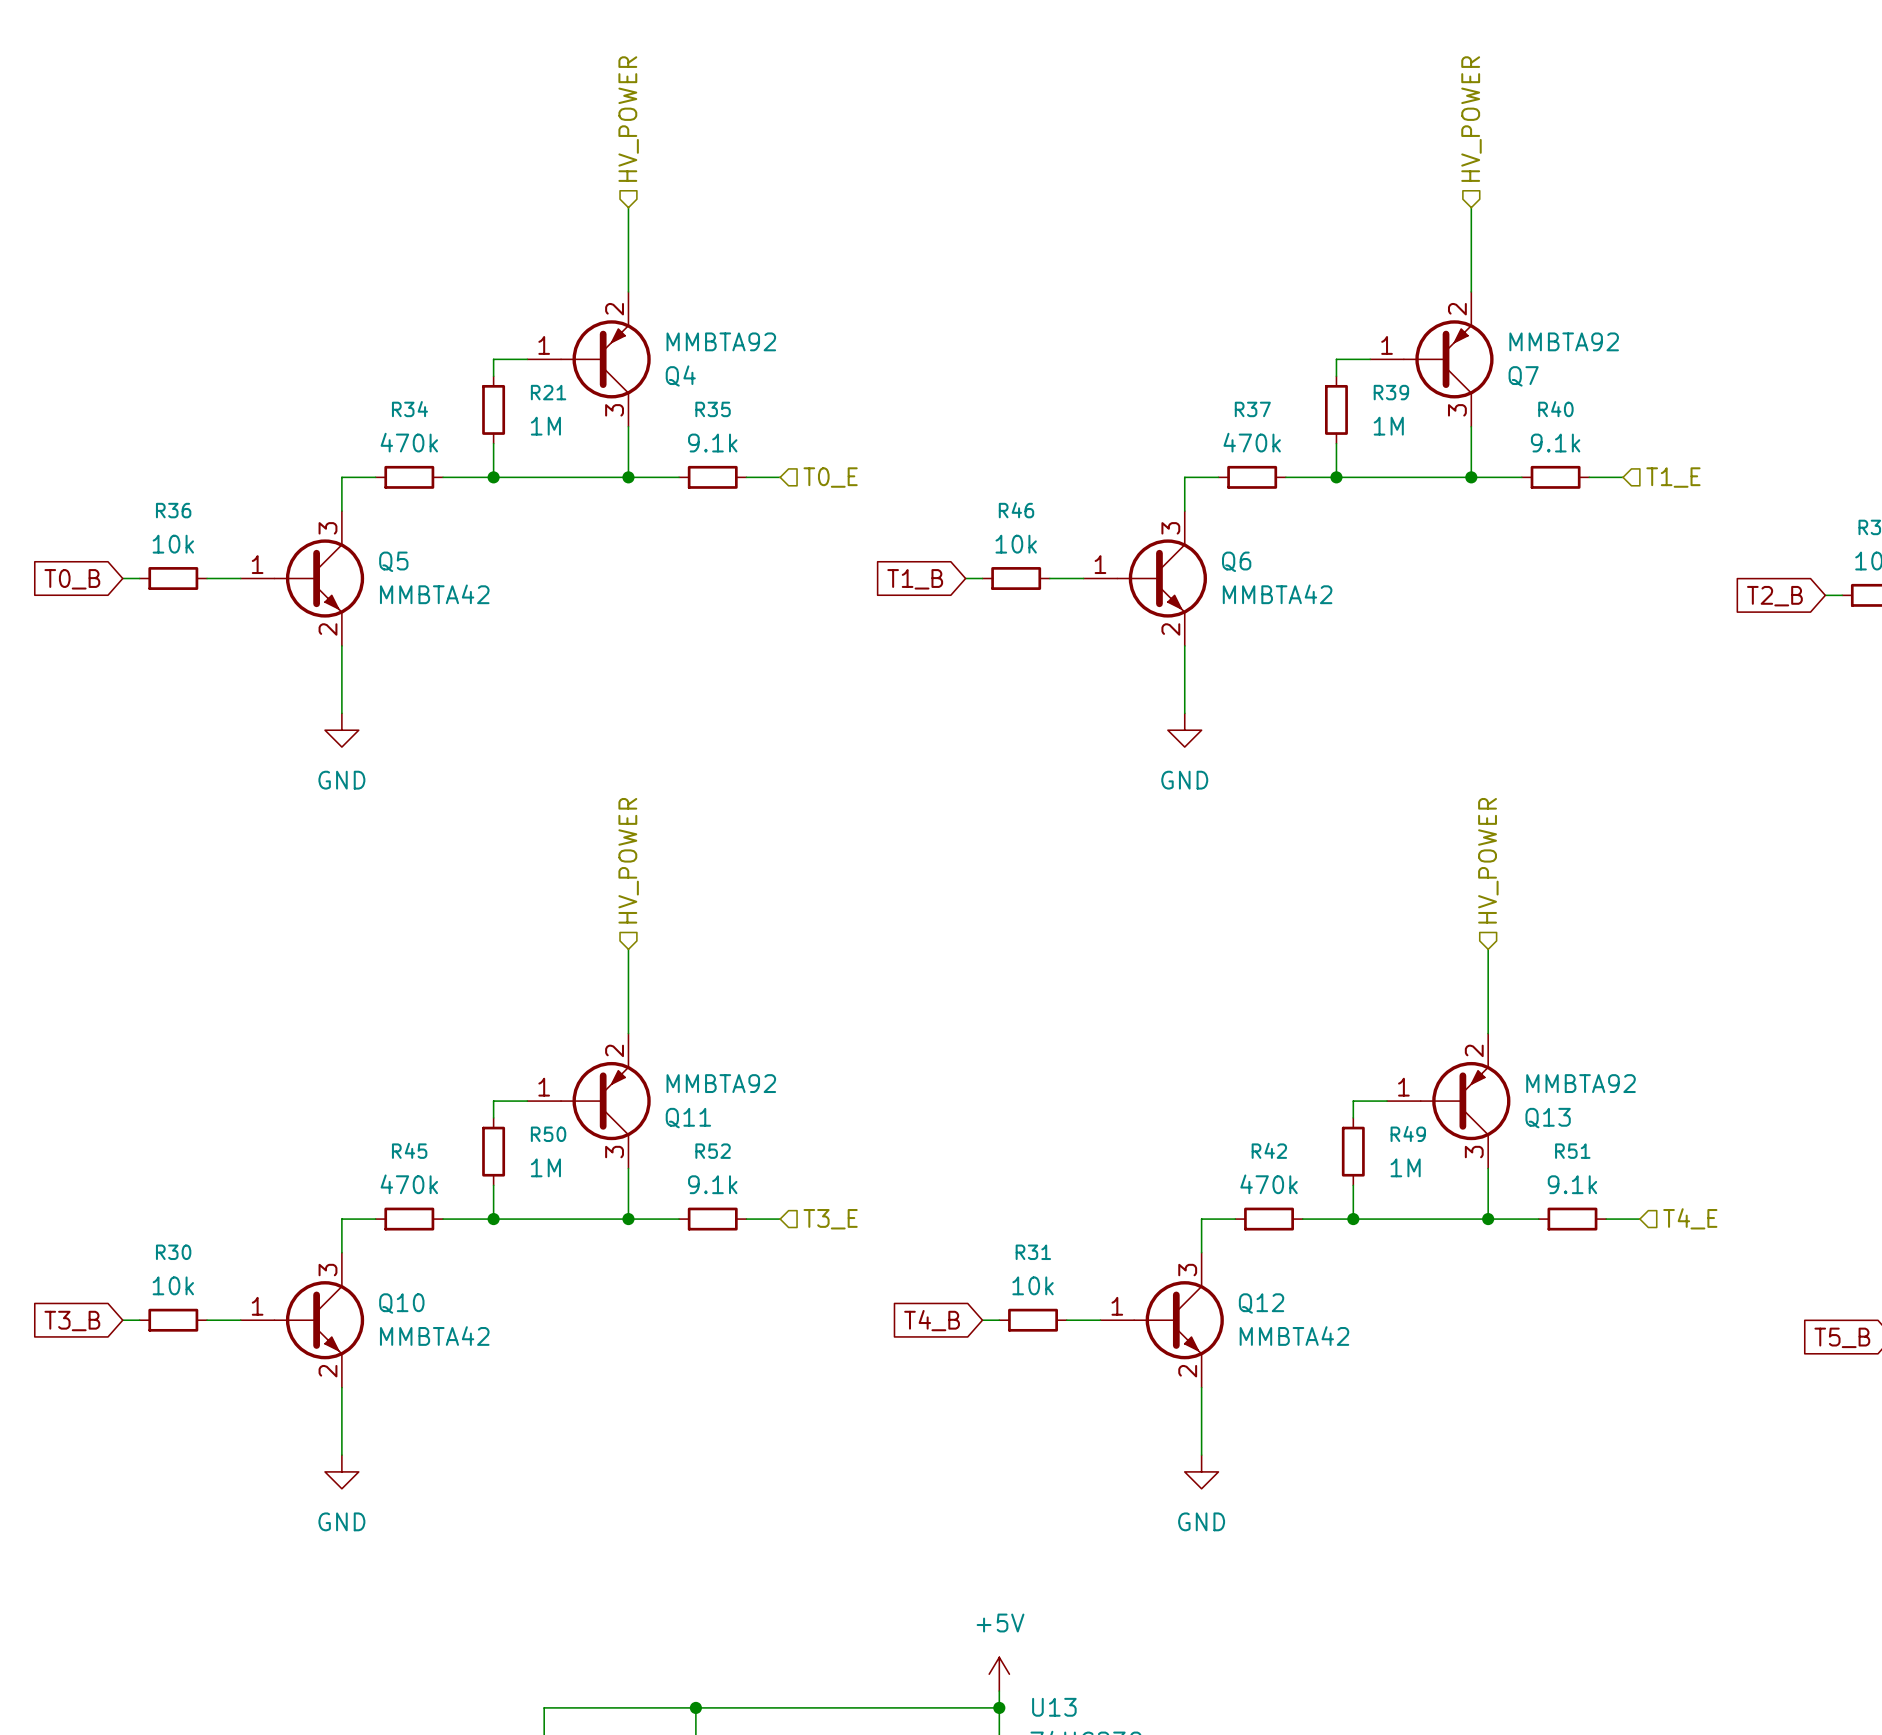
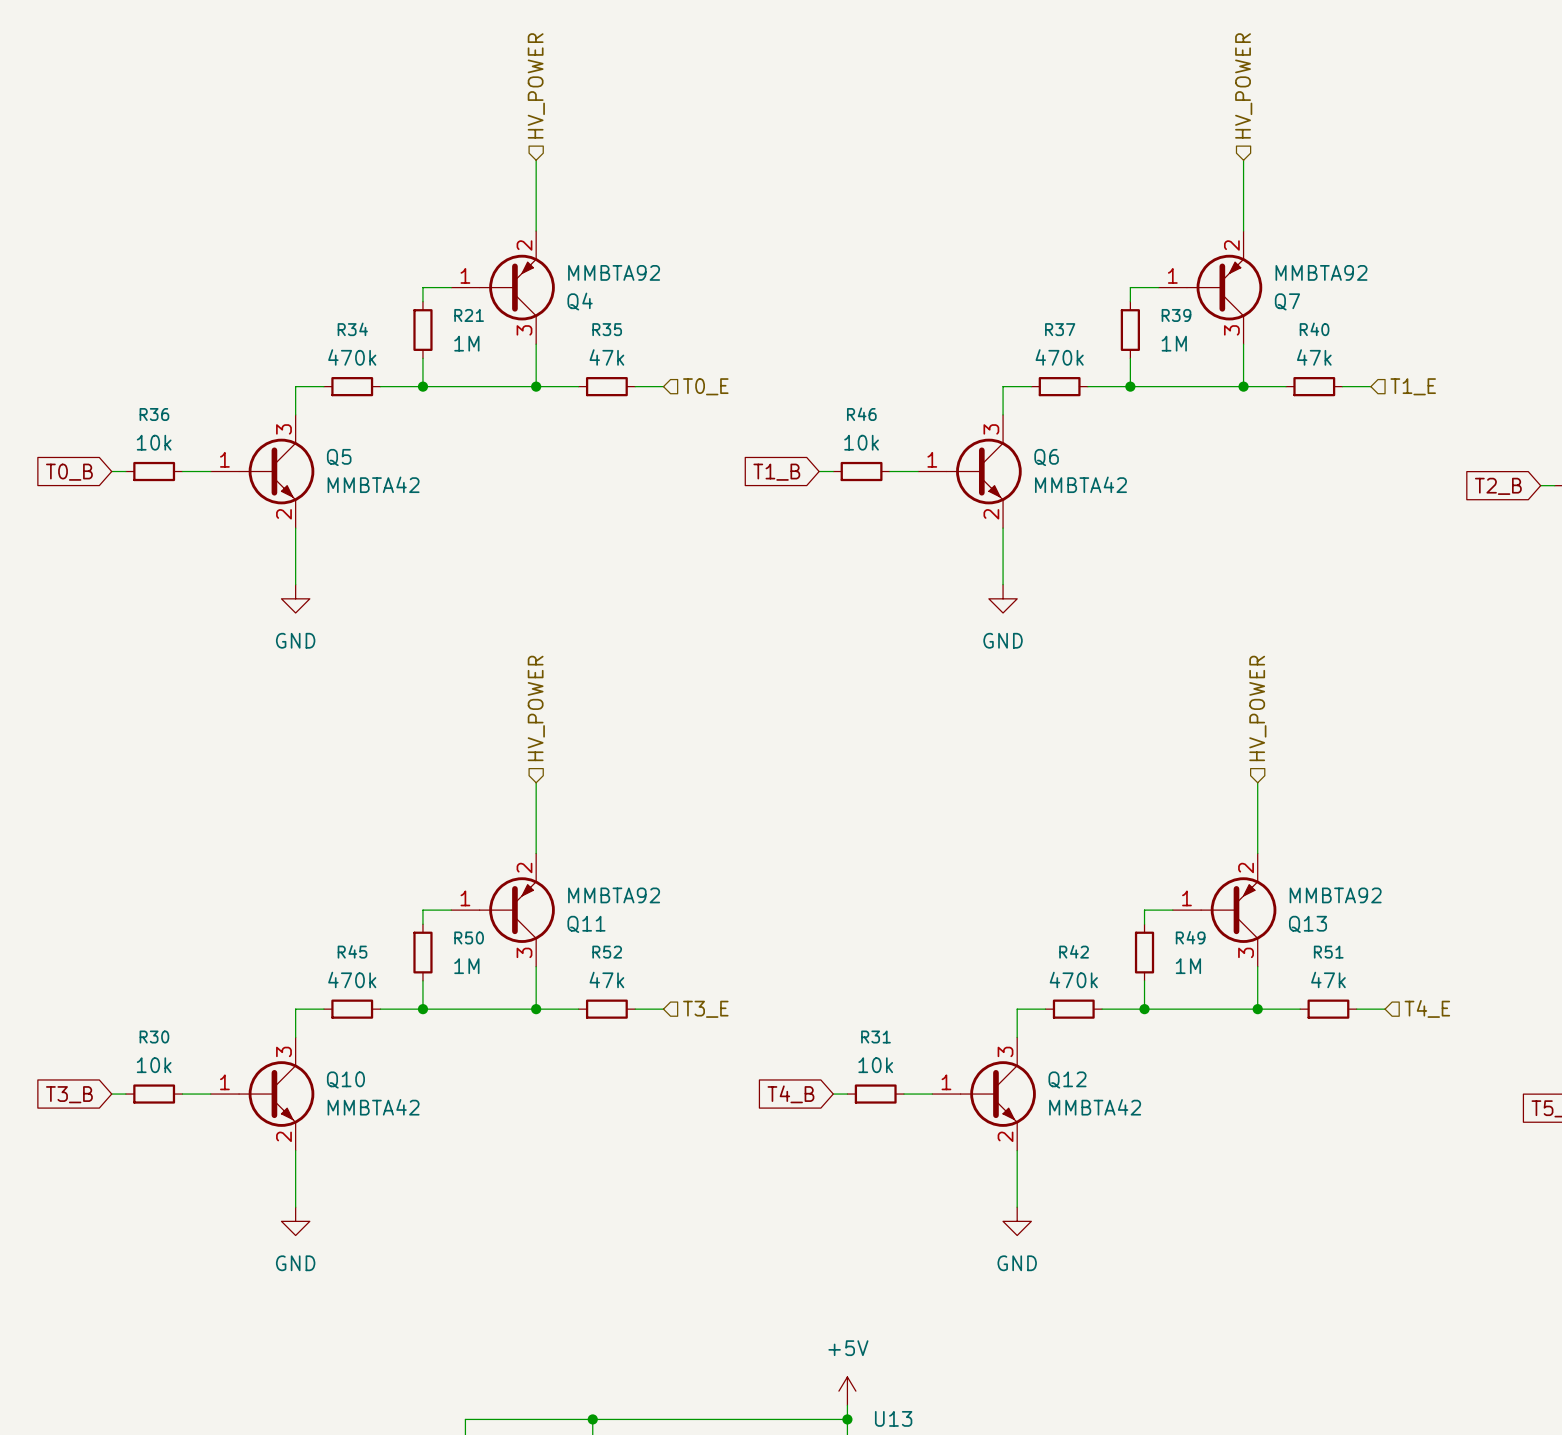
R35 value: 9.1k (712, 443) -> 47k (606, 357)
R40 value: 9.1k (1555, 443) -> 47k (1314, 357)
R52 value: 9.1k (712, 1184) -> 47k (606, 979)
R51 value: 9.1k (1572, 1184) -> 47k (1328, 979)

